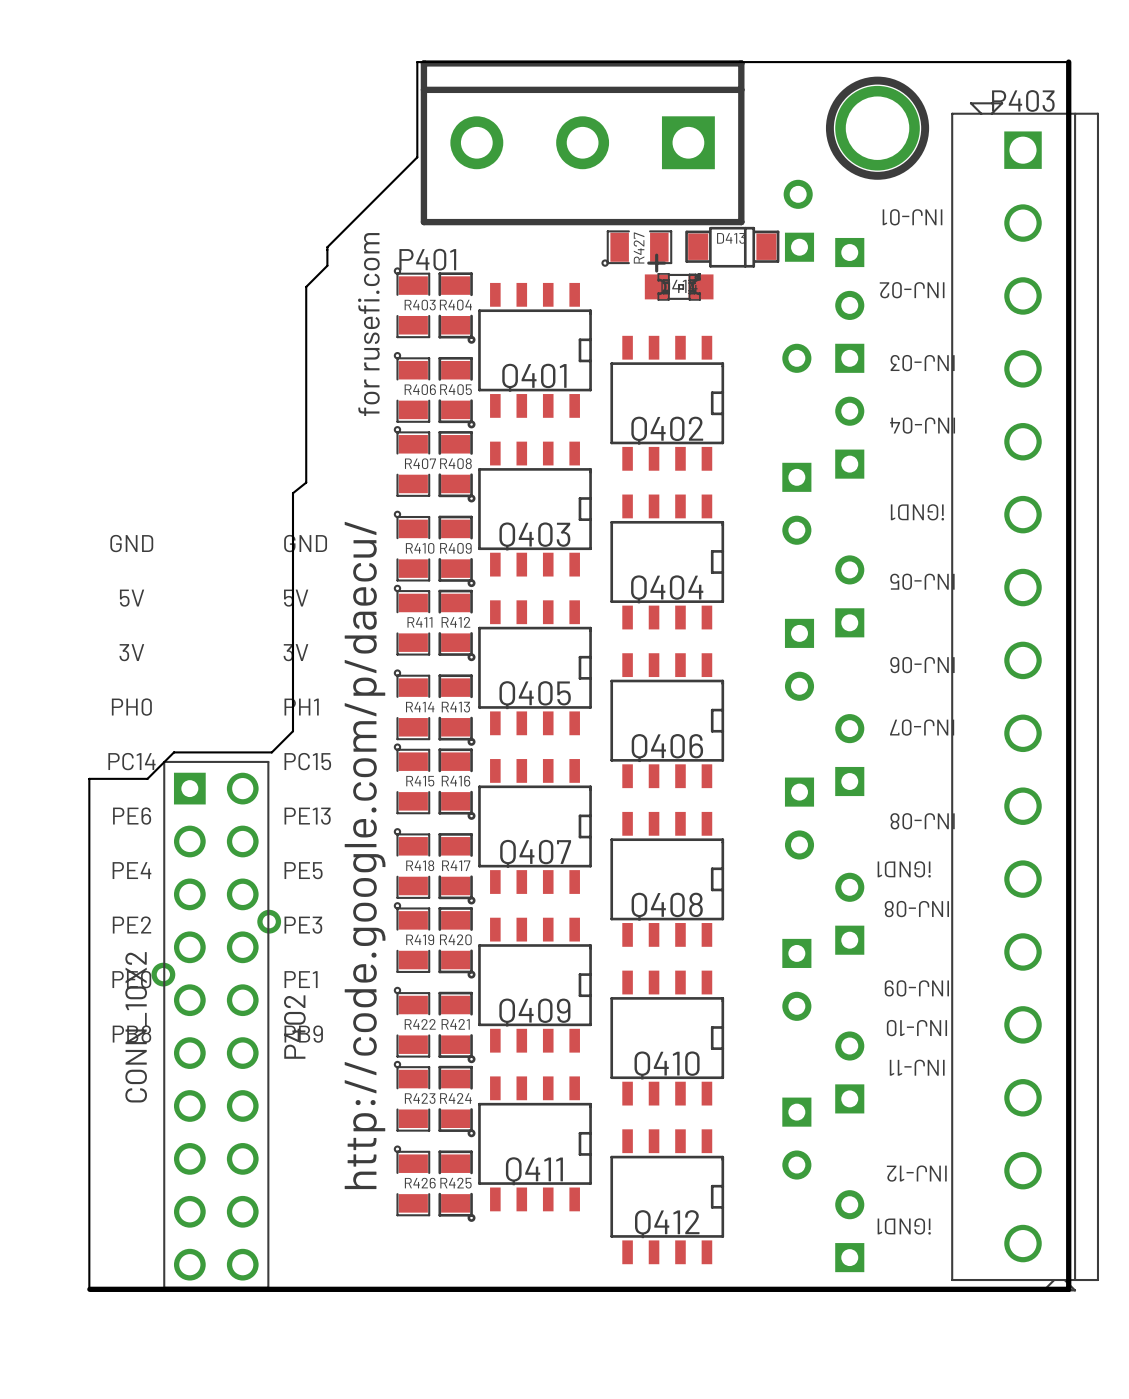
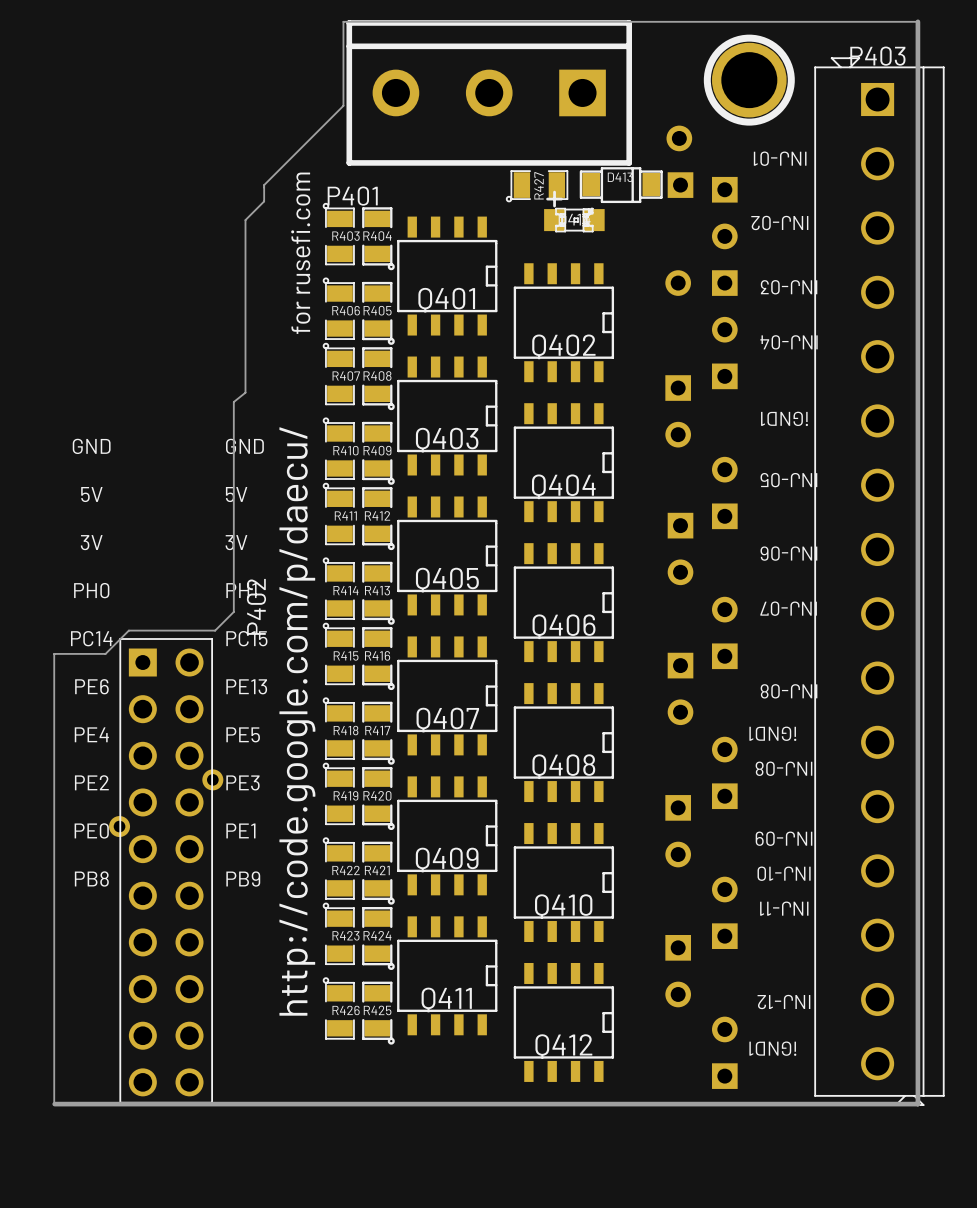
P402 value: CONN_10X2 (136, 1027) -> none
P402 name position: P402 (294, 1027) -> P402 (256, 606)

